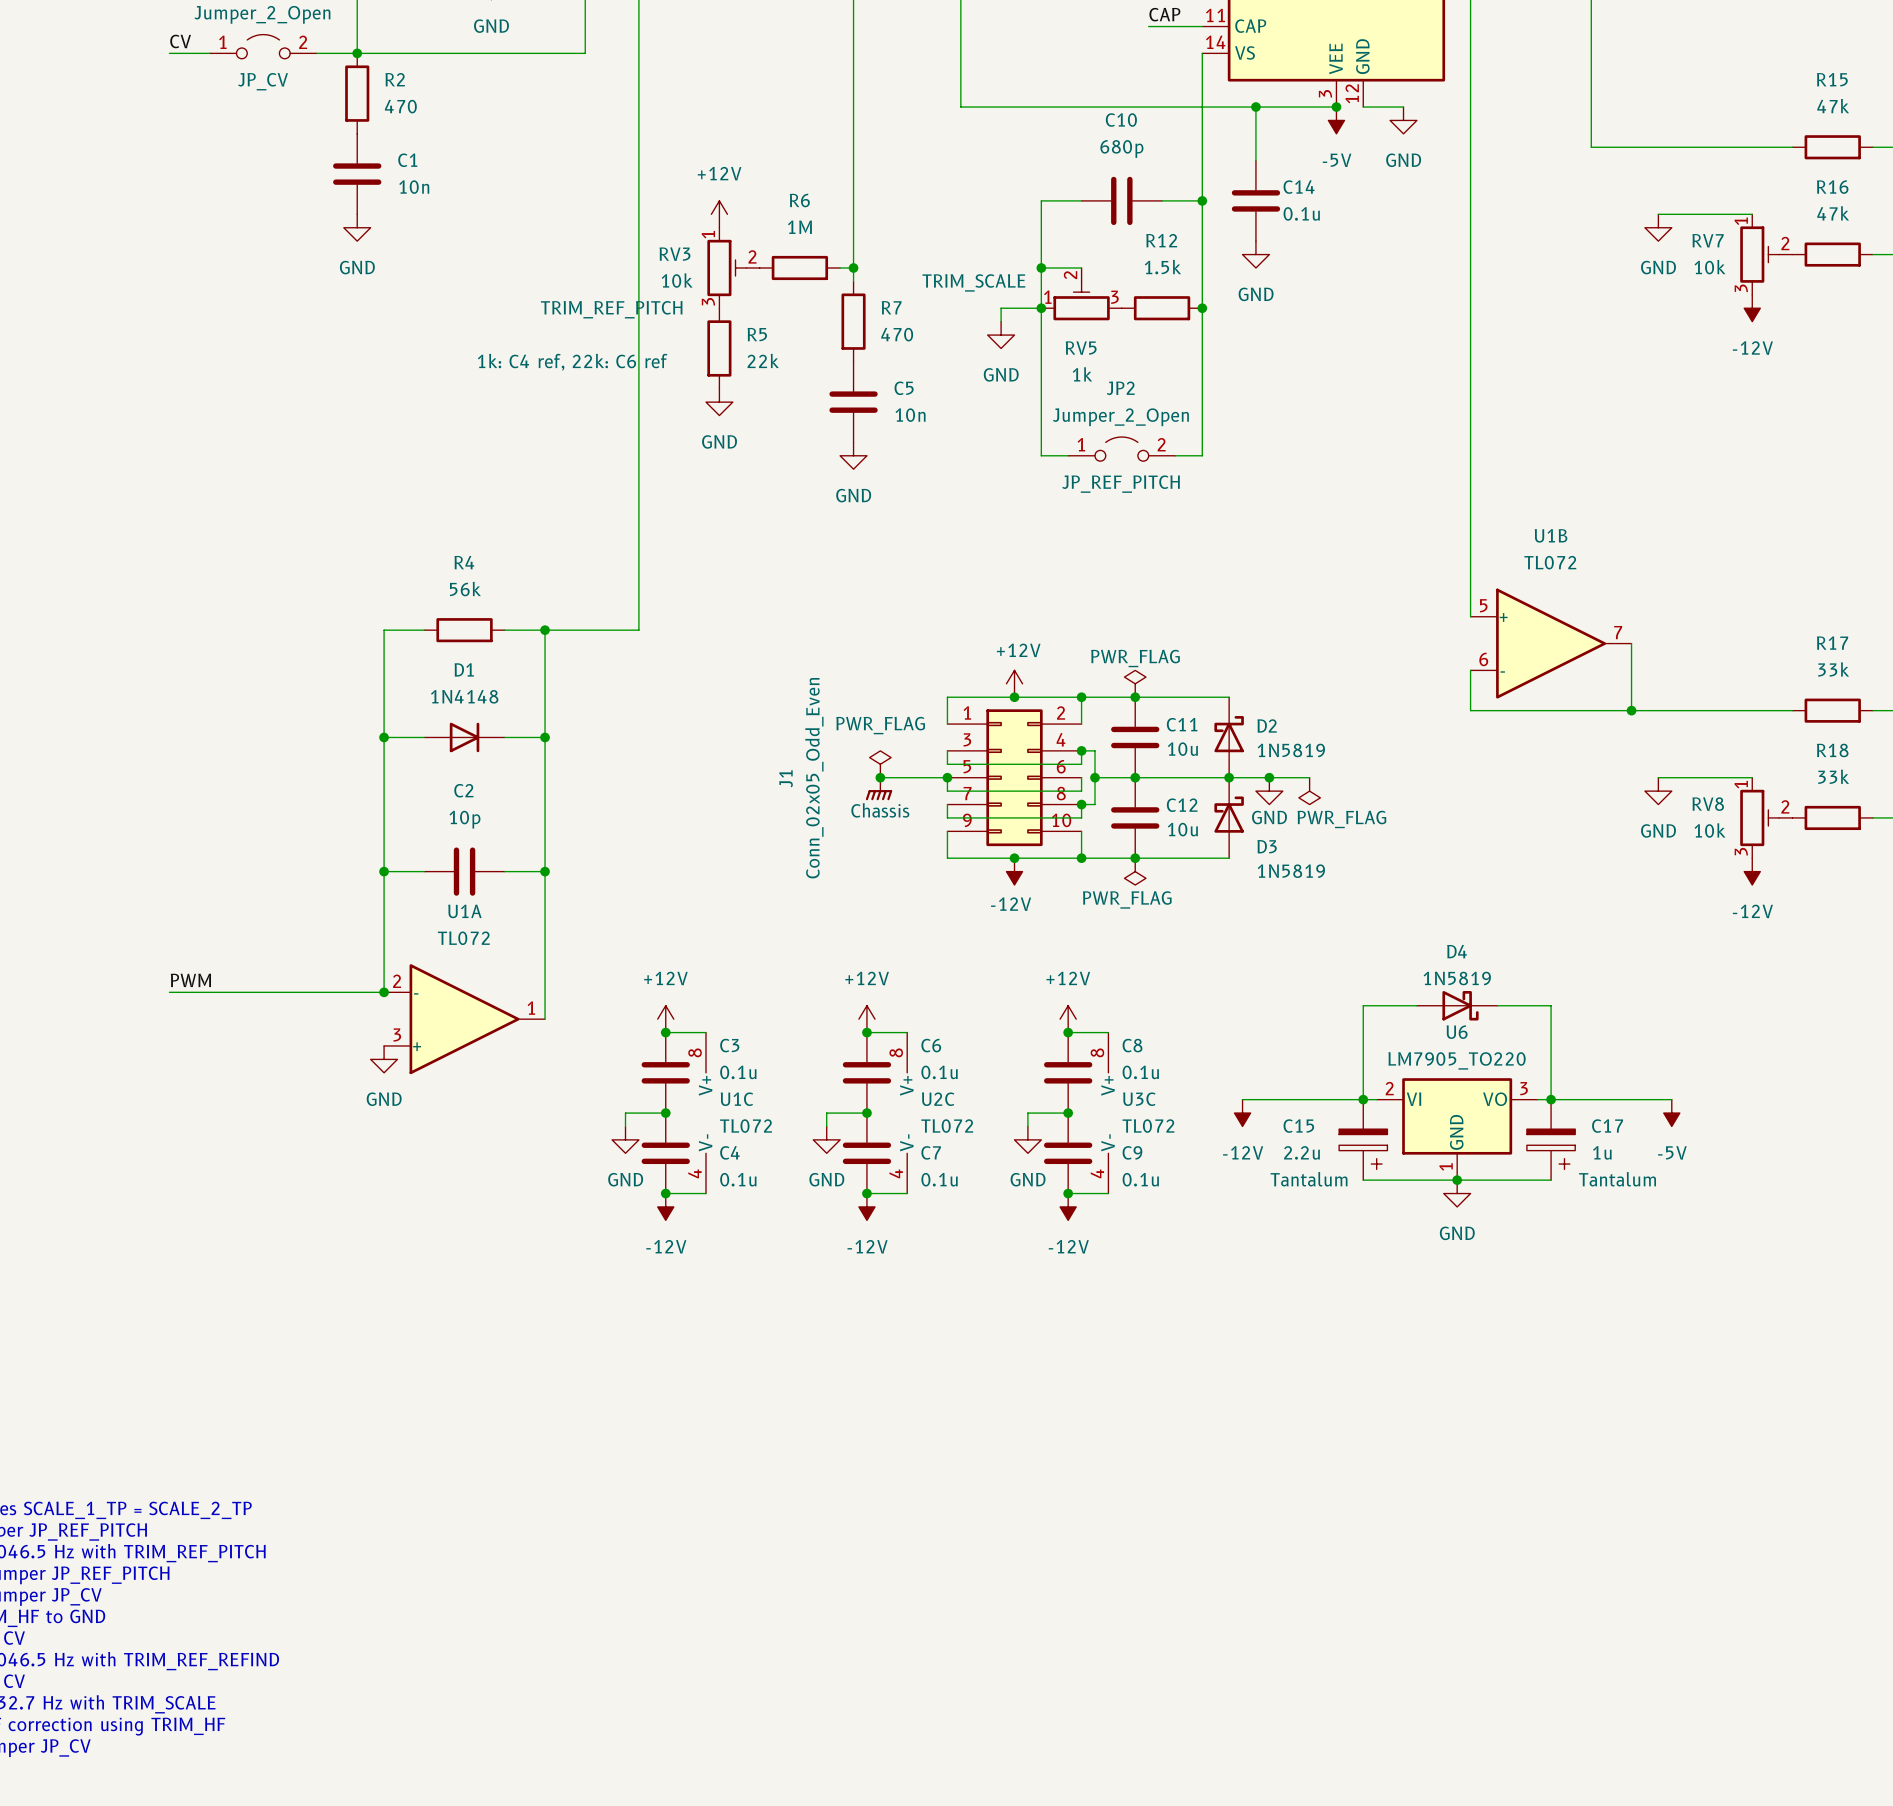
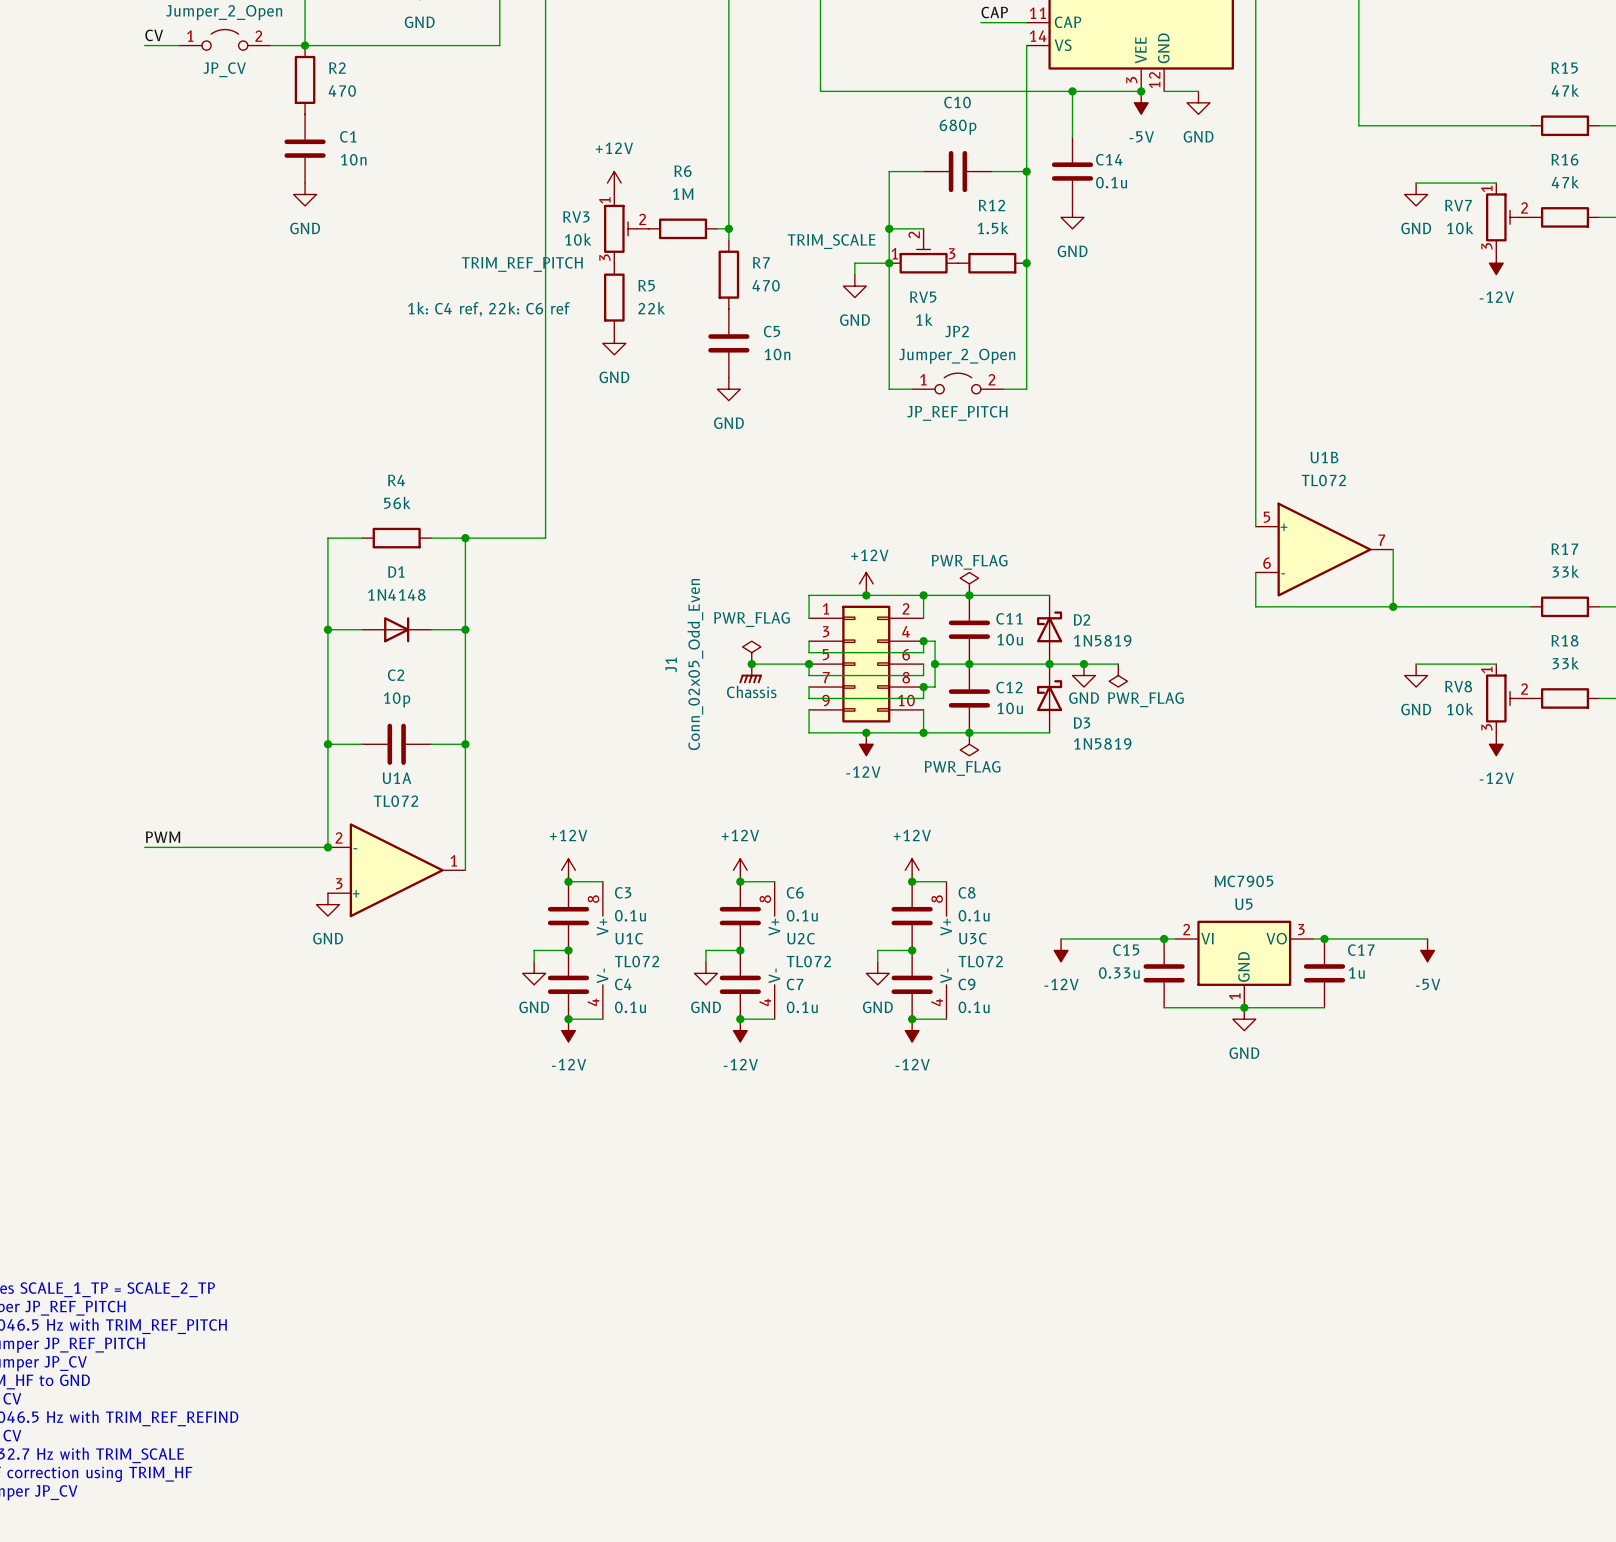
wire: (1416, 1005) (1363, 1005) (1363, 1099) -> none
D4: 1N5819 (1457, 1005) -> none
wire: (1497, 1005) (1551, 1005) (1551, 1099) -> none
U6 name: U6 (1457, 1032) -> U5 (1243, 904)
U6 value: LM7905_TO220 (1457, 1060) -> MC7905 (1244, 881)
C15 symbol: [1339, 1099, 1388, 1181] -> [1143, 939, 1185, 1008]
C17 symbol: [1526, 1099, 1576, 1181] -> [1303, 939, 1346, 1008]
C15 value: 2.2u (1301, 1152) -> 0.33u (1119, 973)
C15 text: Tantalum (1309, 1179) -> none
C17 text: Tantalum (1617, 1179) -> none

